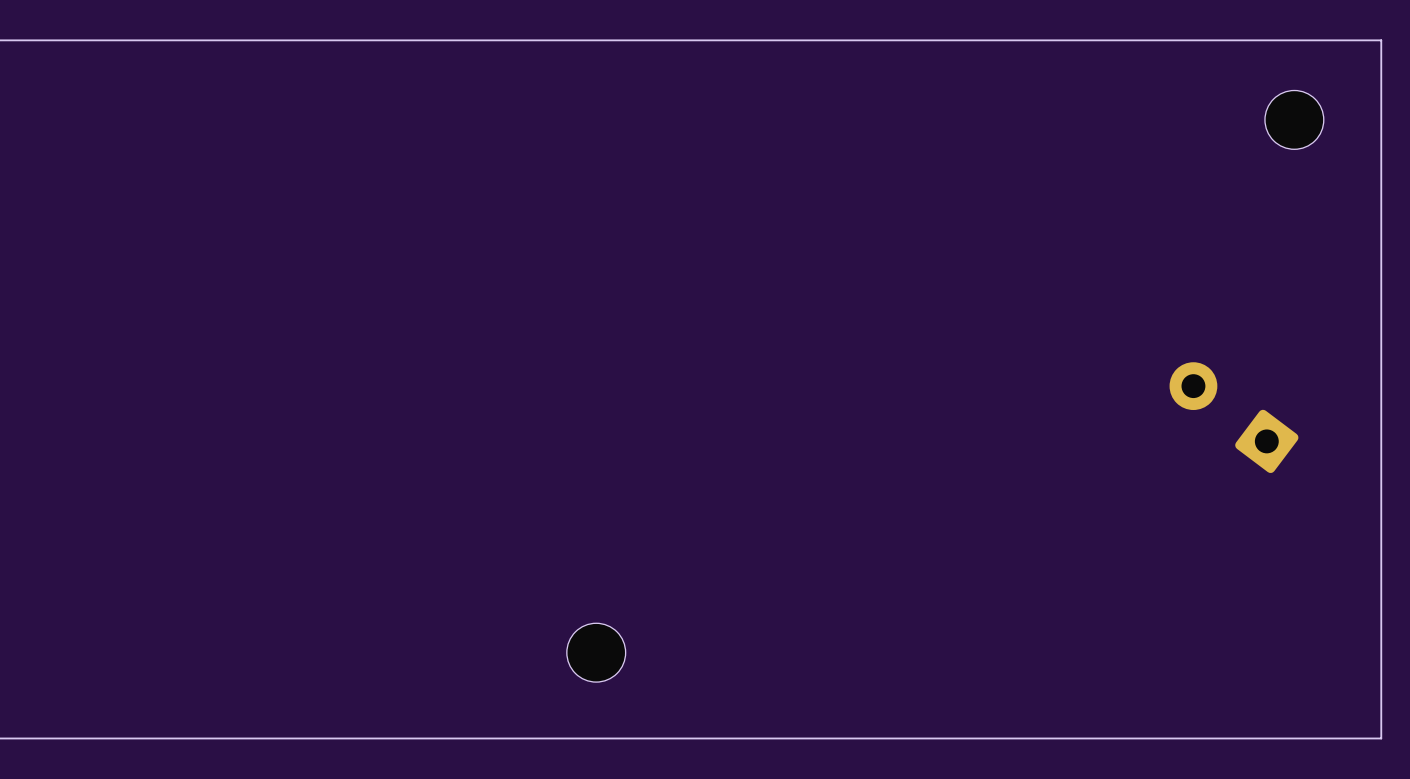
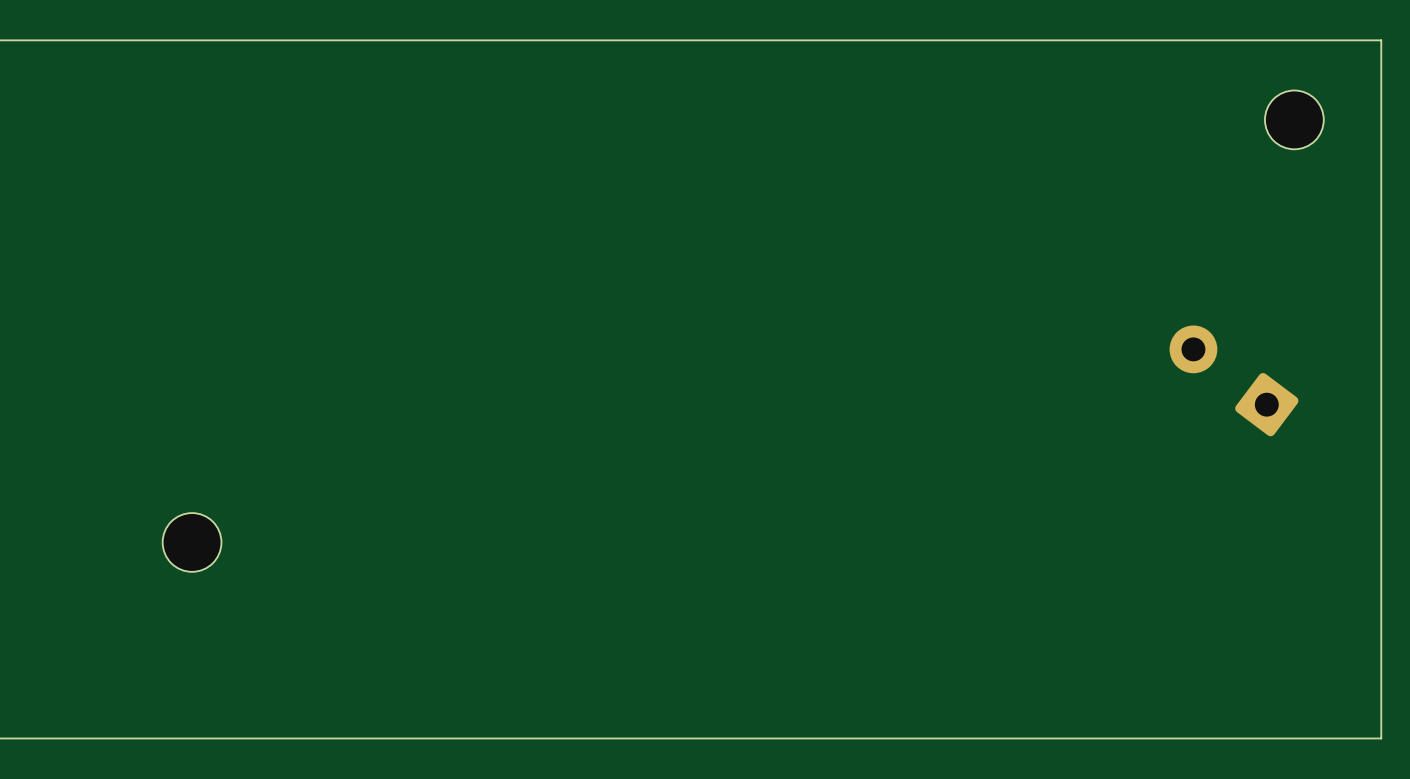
part position: (1233, 417) -> (1233, 380)
part position: (596, 652) -> (192, 542)

